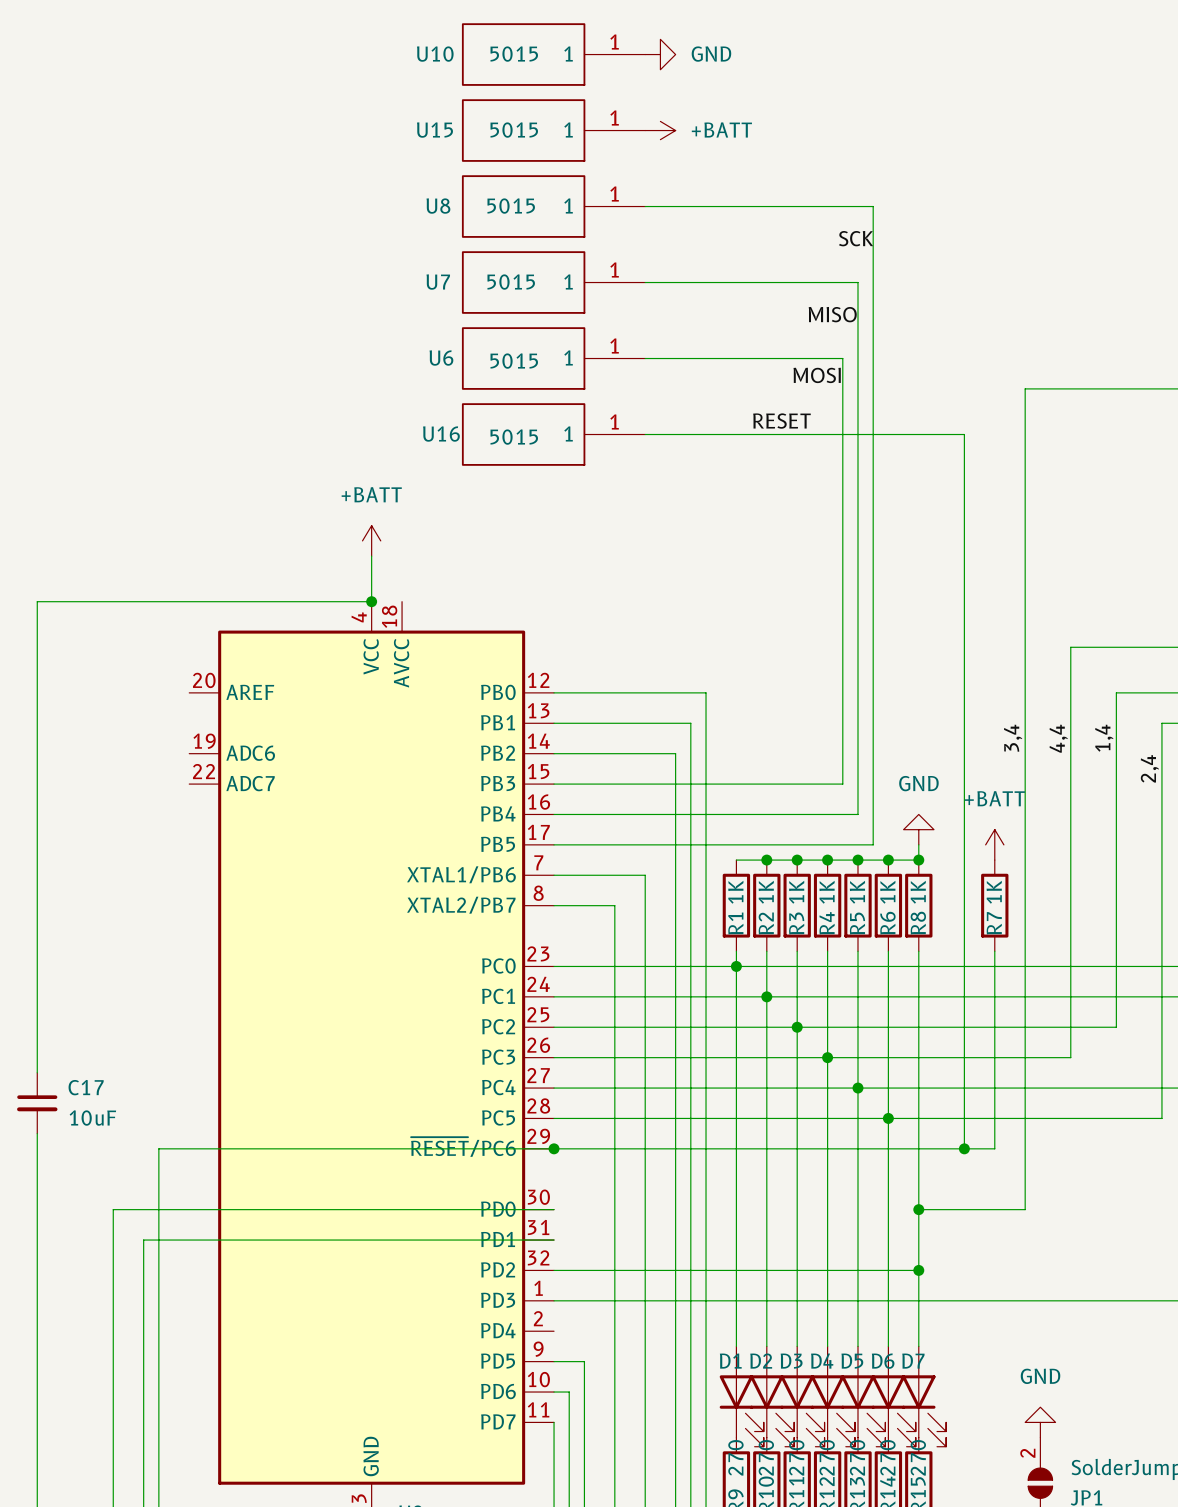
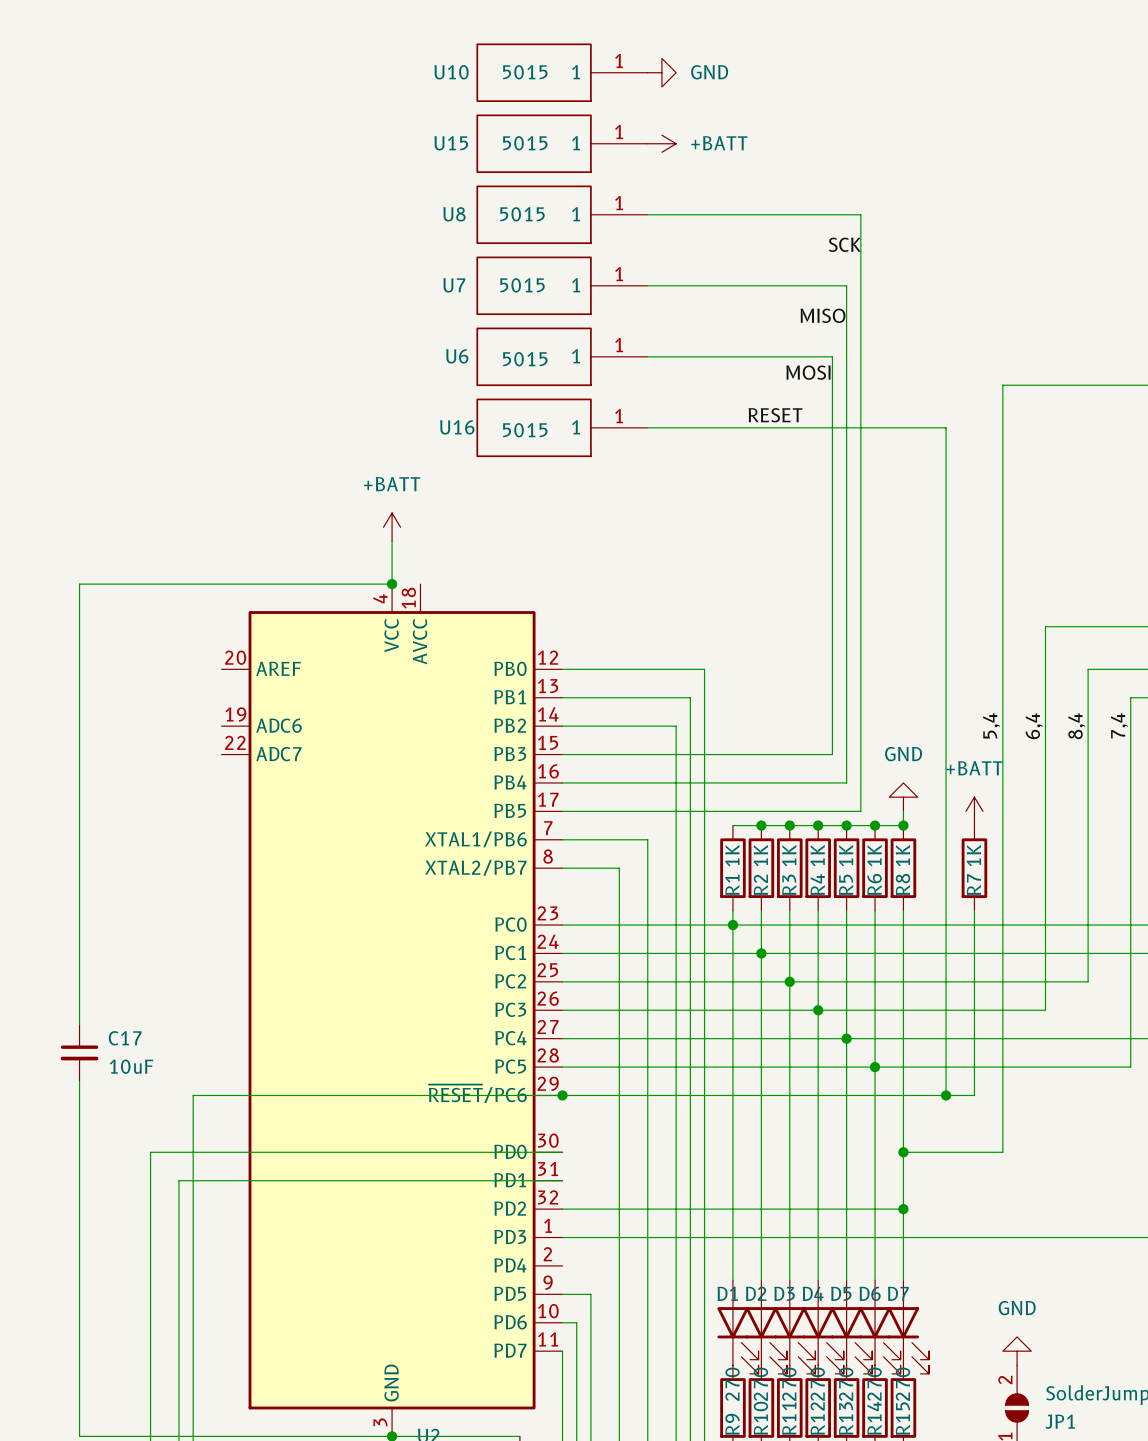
label: 3,4 (1013, 738) -> 5,4 (991, 725)
label: 4,4 (1058, 738) -> 6,4 (1034, 726)
label: 1,4 (1104, 738) -> 8,4 (1076, 726)
label: 2,4 (1149, 768) -> 7,4 (1119, 725)

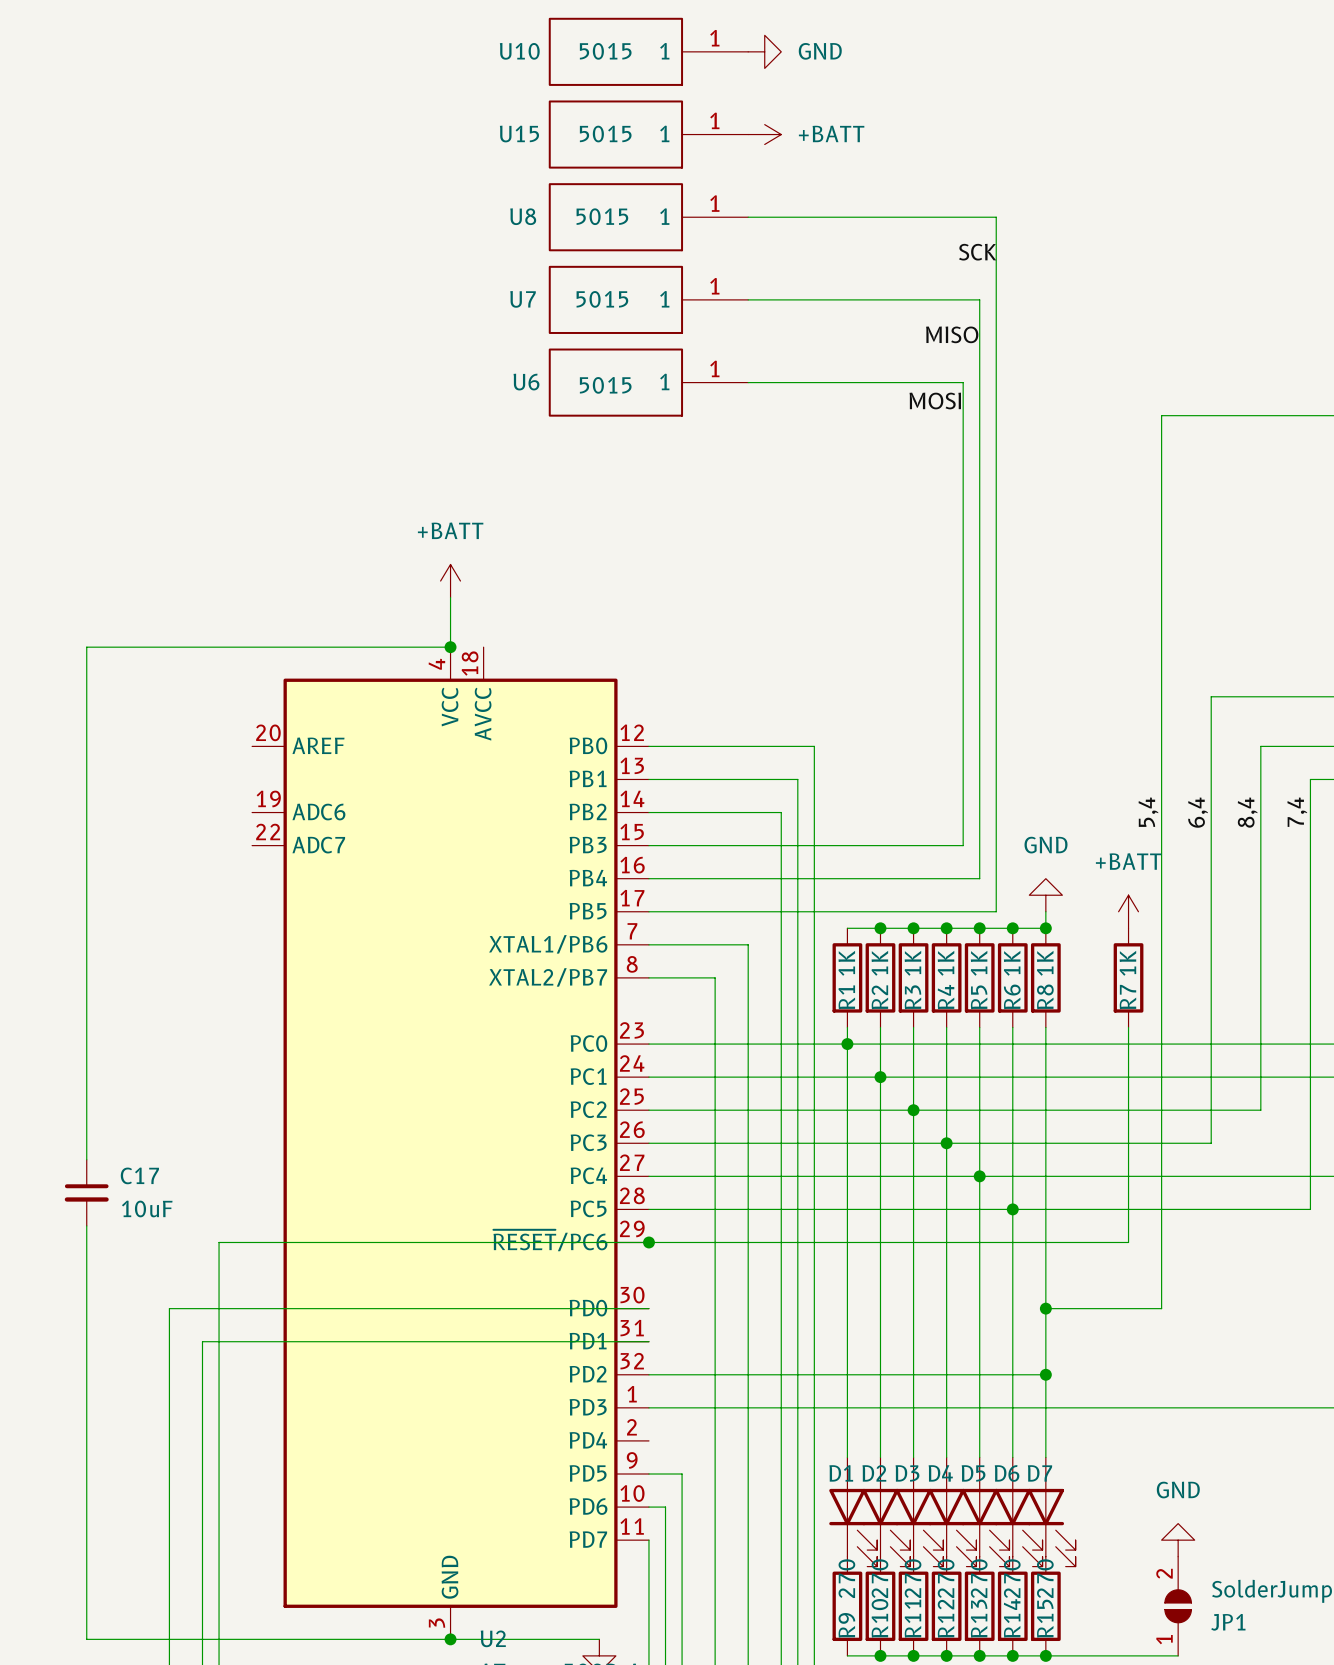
label: RESET (775, 415) -> none
U16: 5015 (562, 427) -> none
wire: (647, 427) (946, 427) (946, 1095) -> none
junction: (946, 1095) -> none

